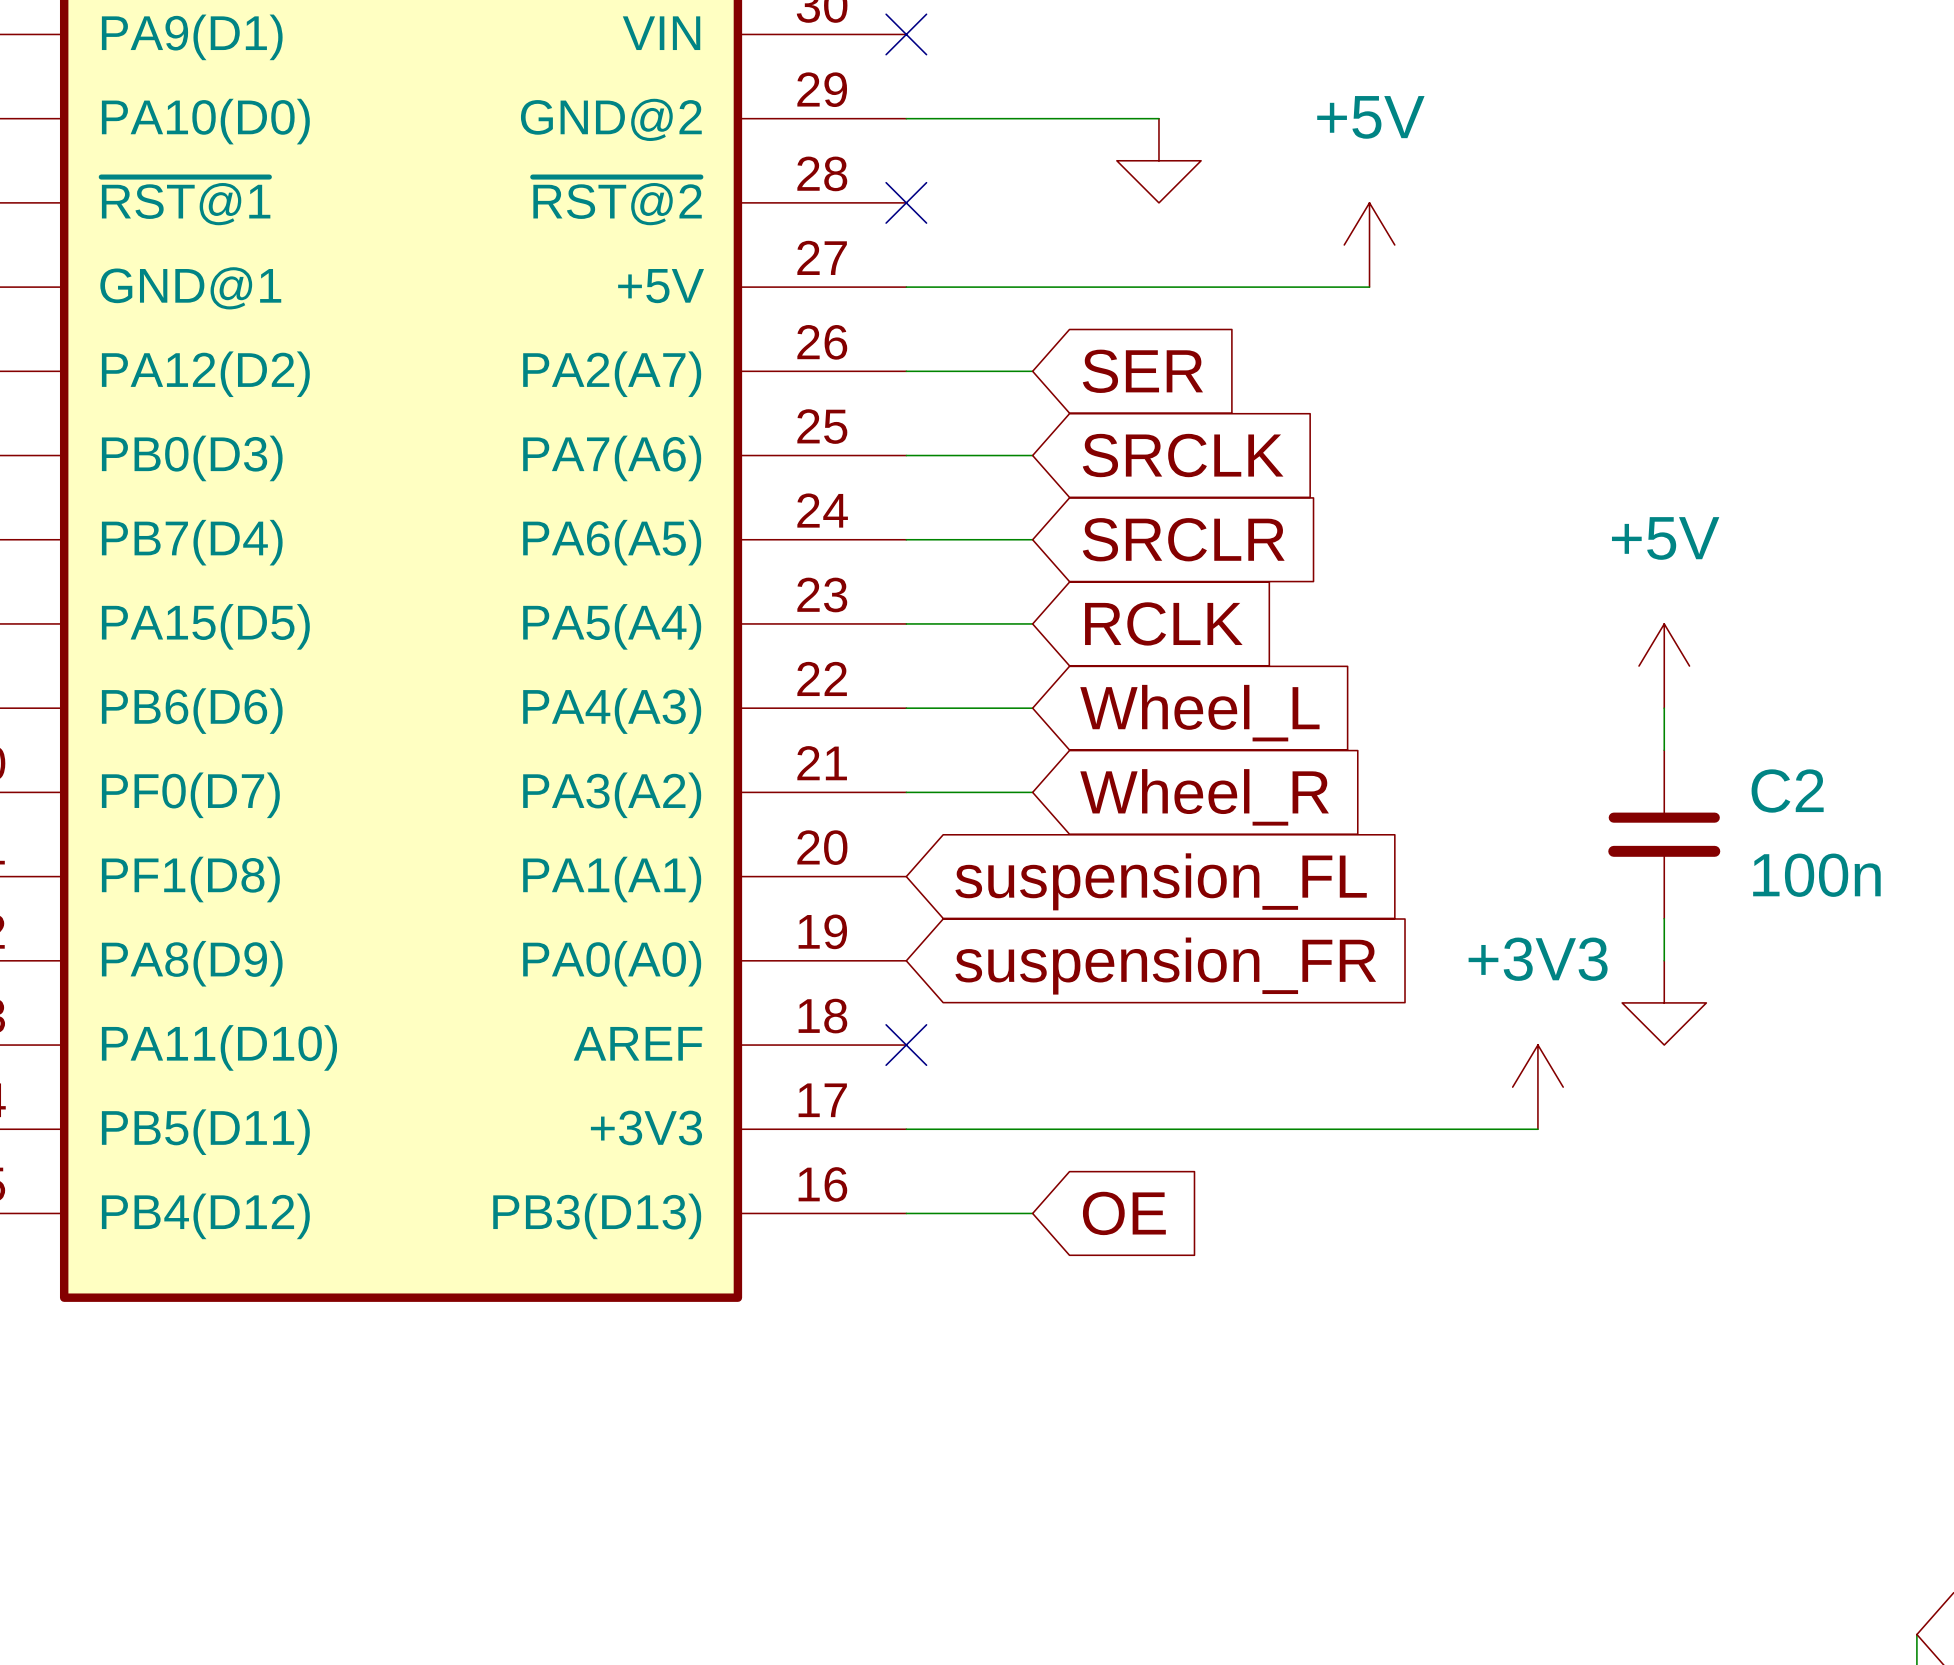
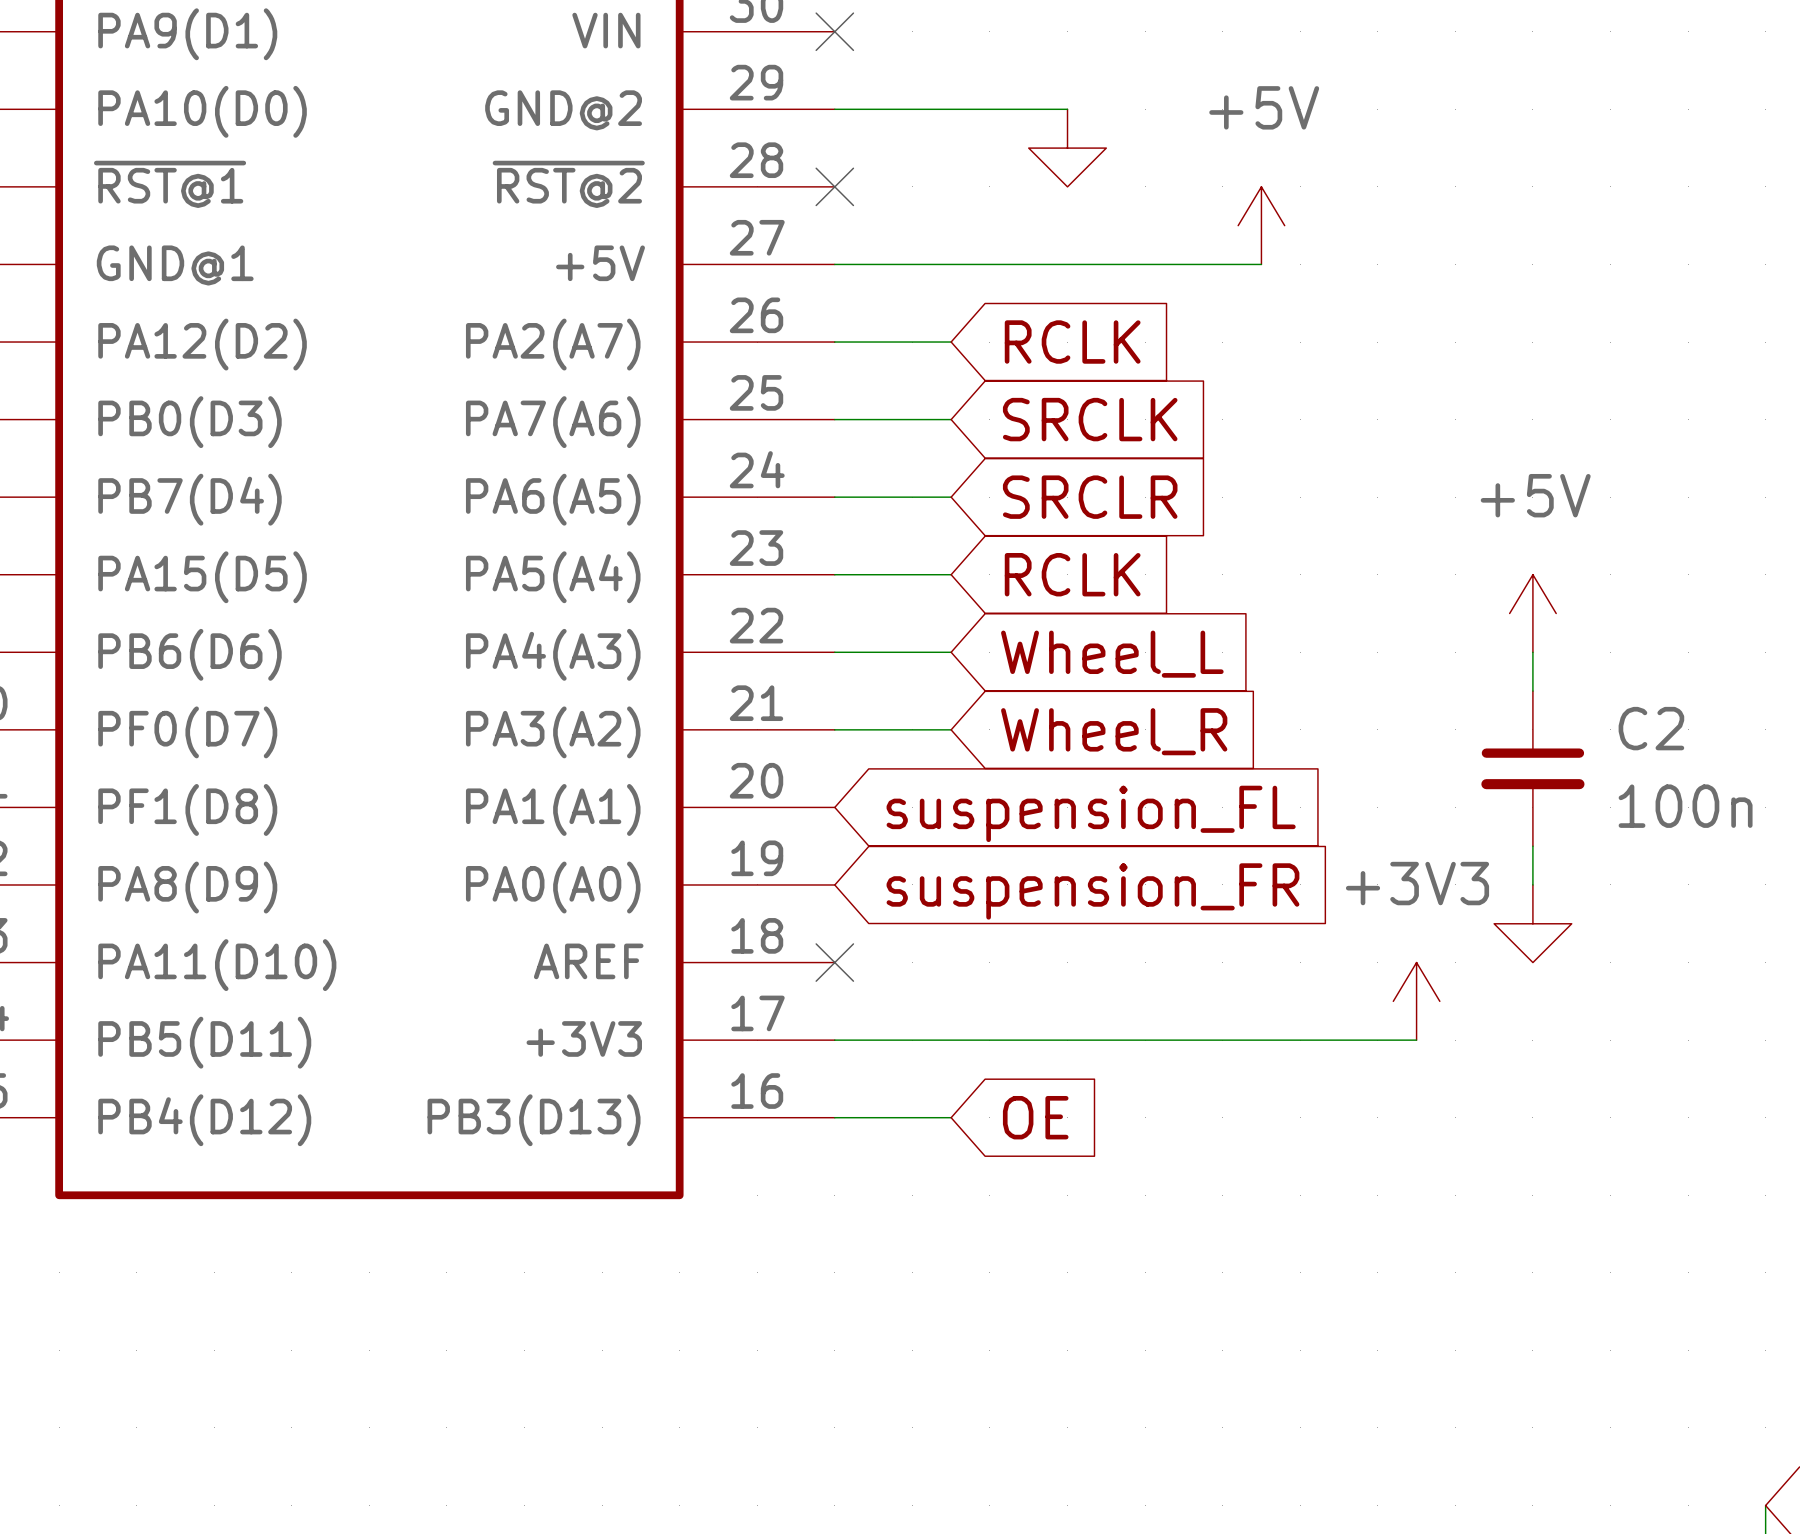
global label: SER (1142, 371) -> RCLK (1072, 342)

